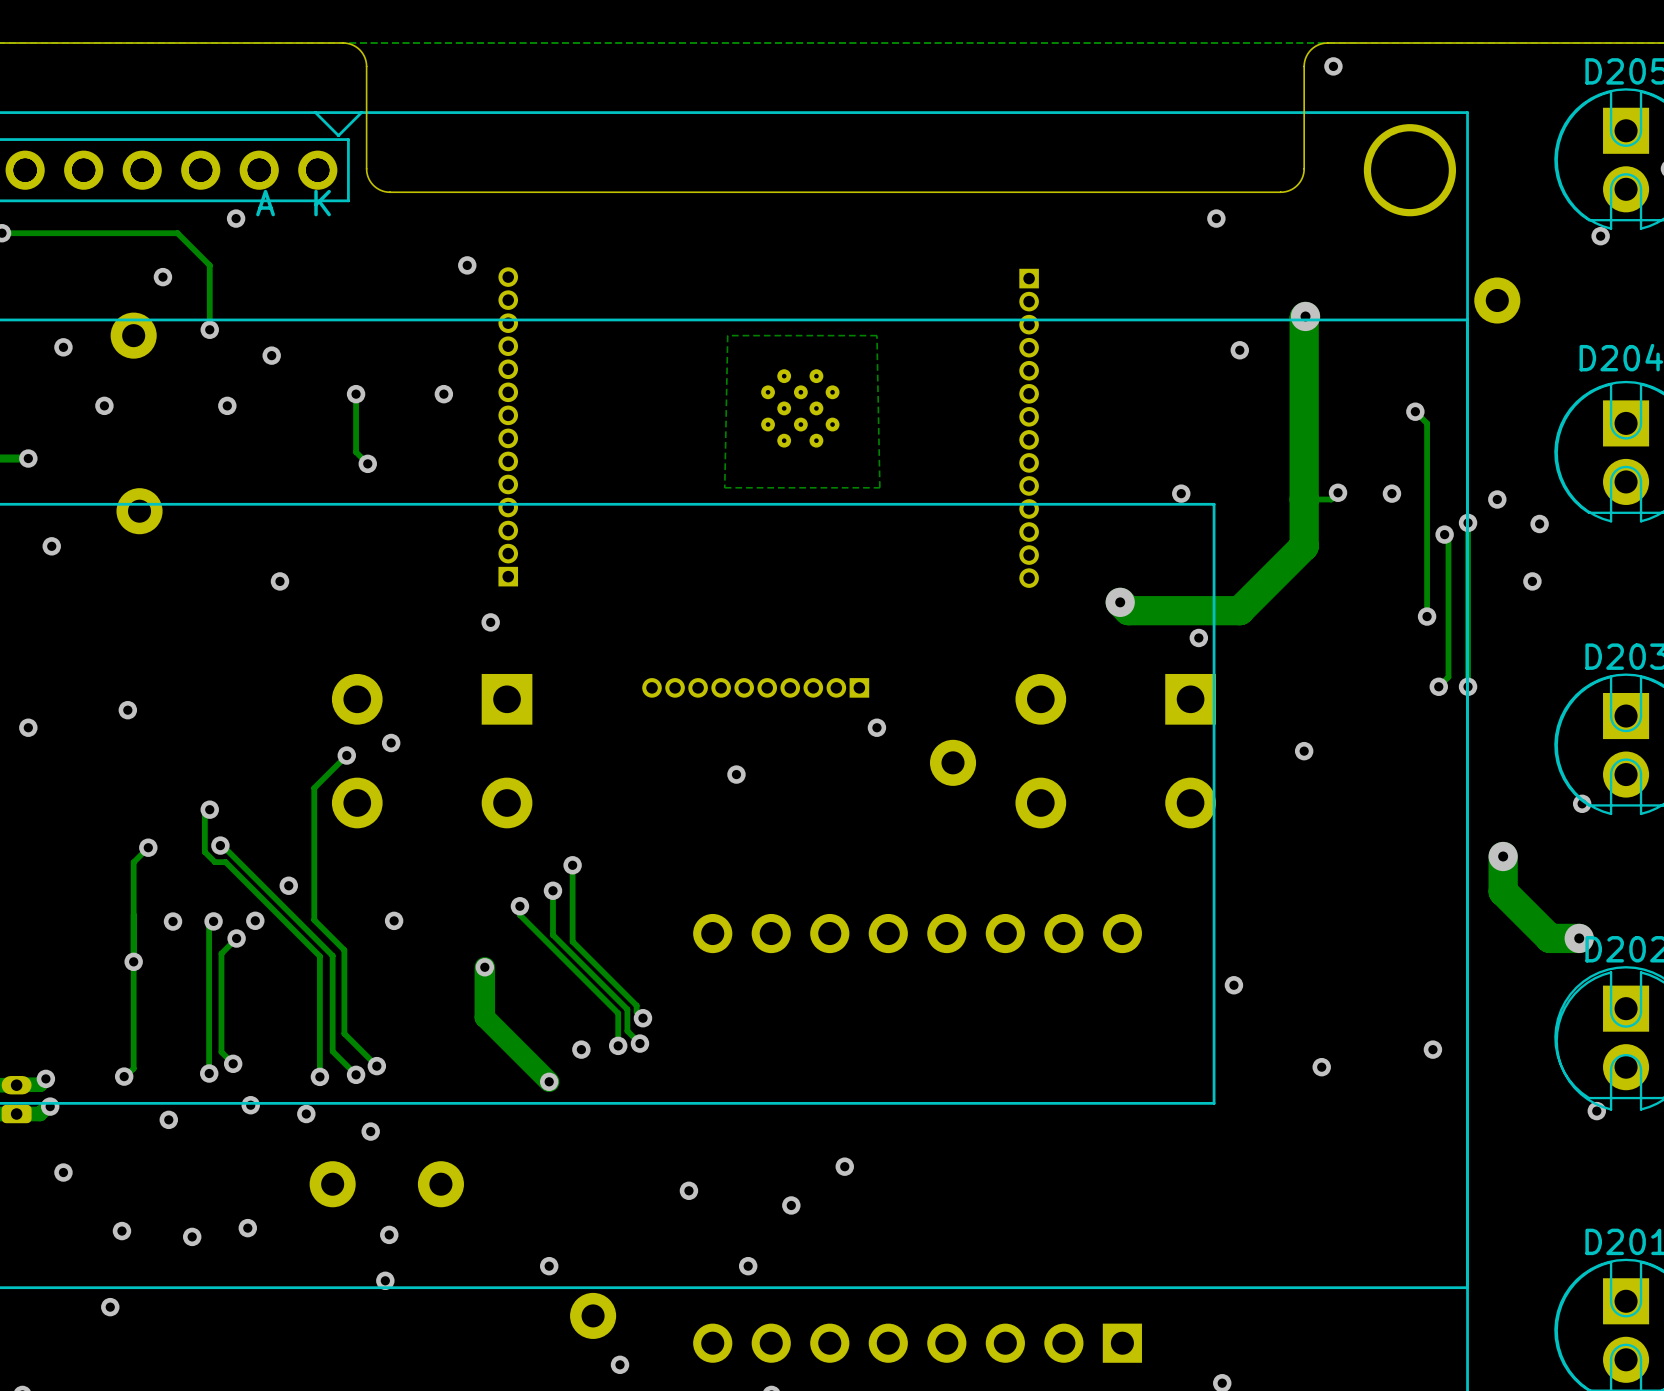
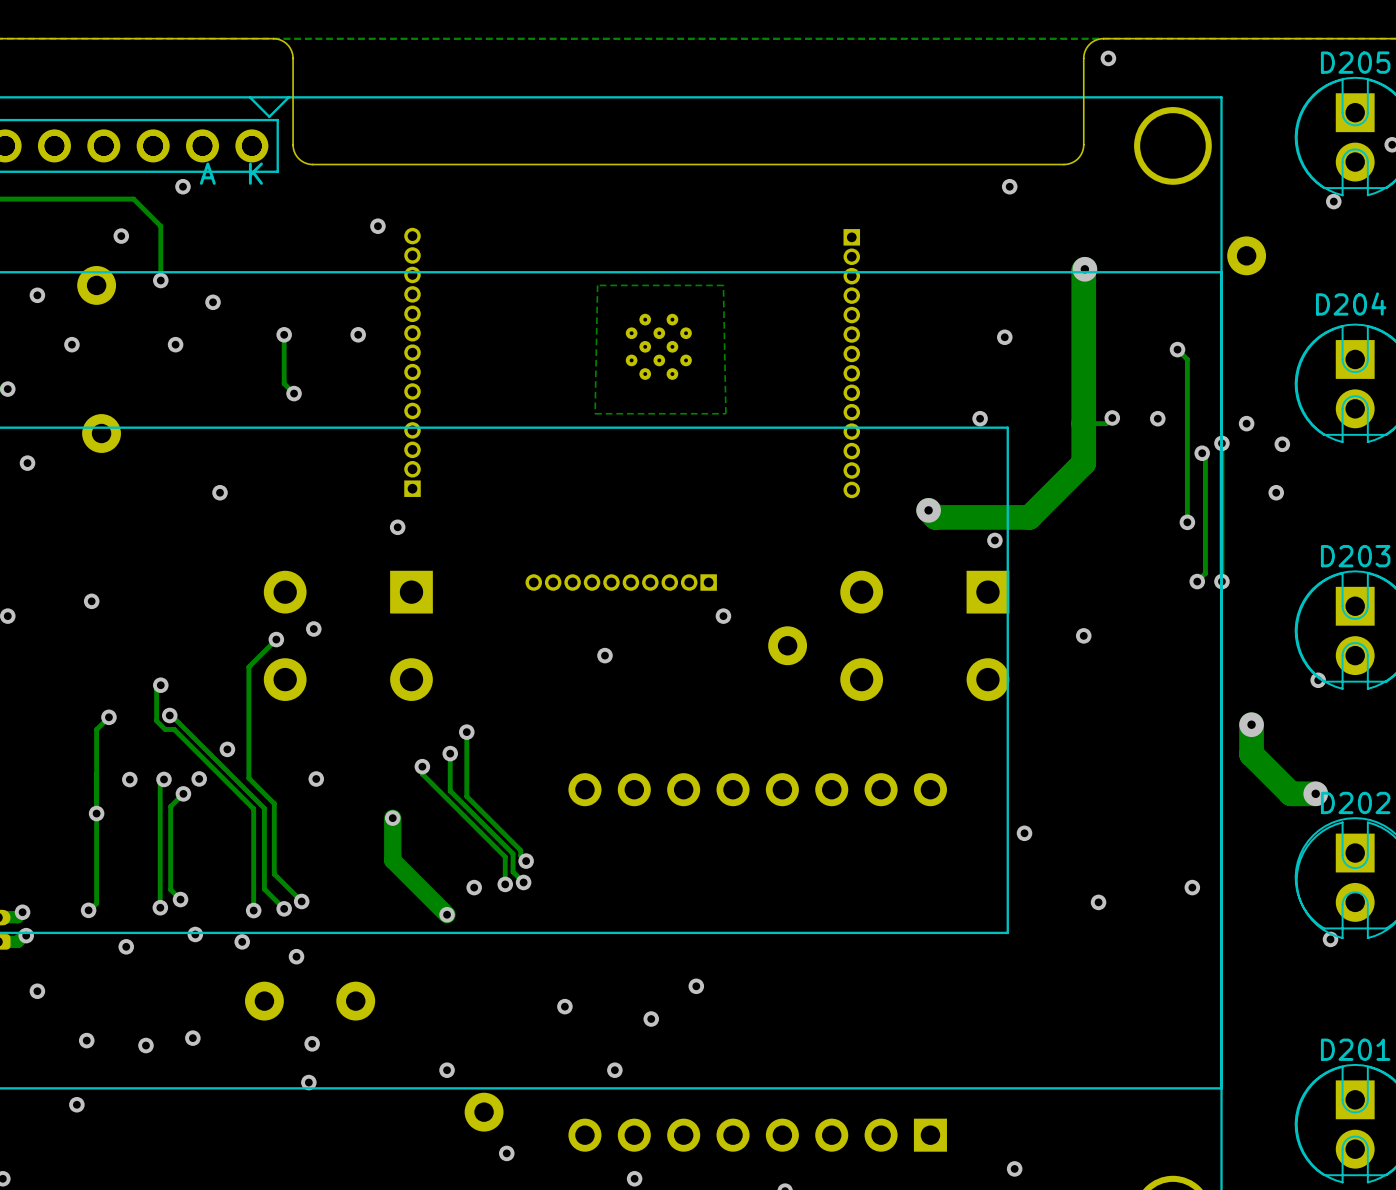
via position: (1239, 350) -> (1004, 337)

